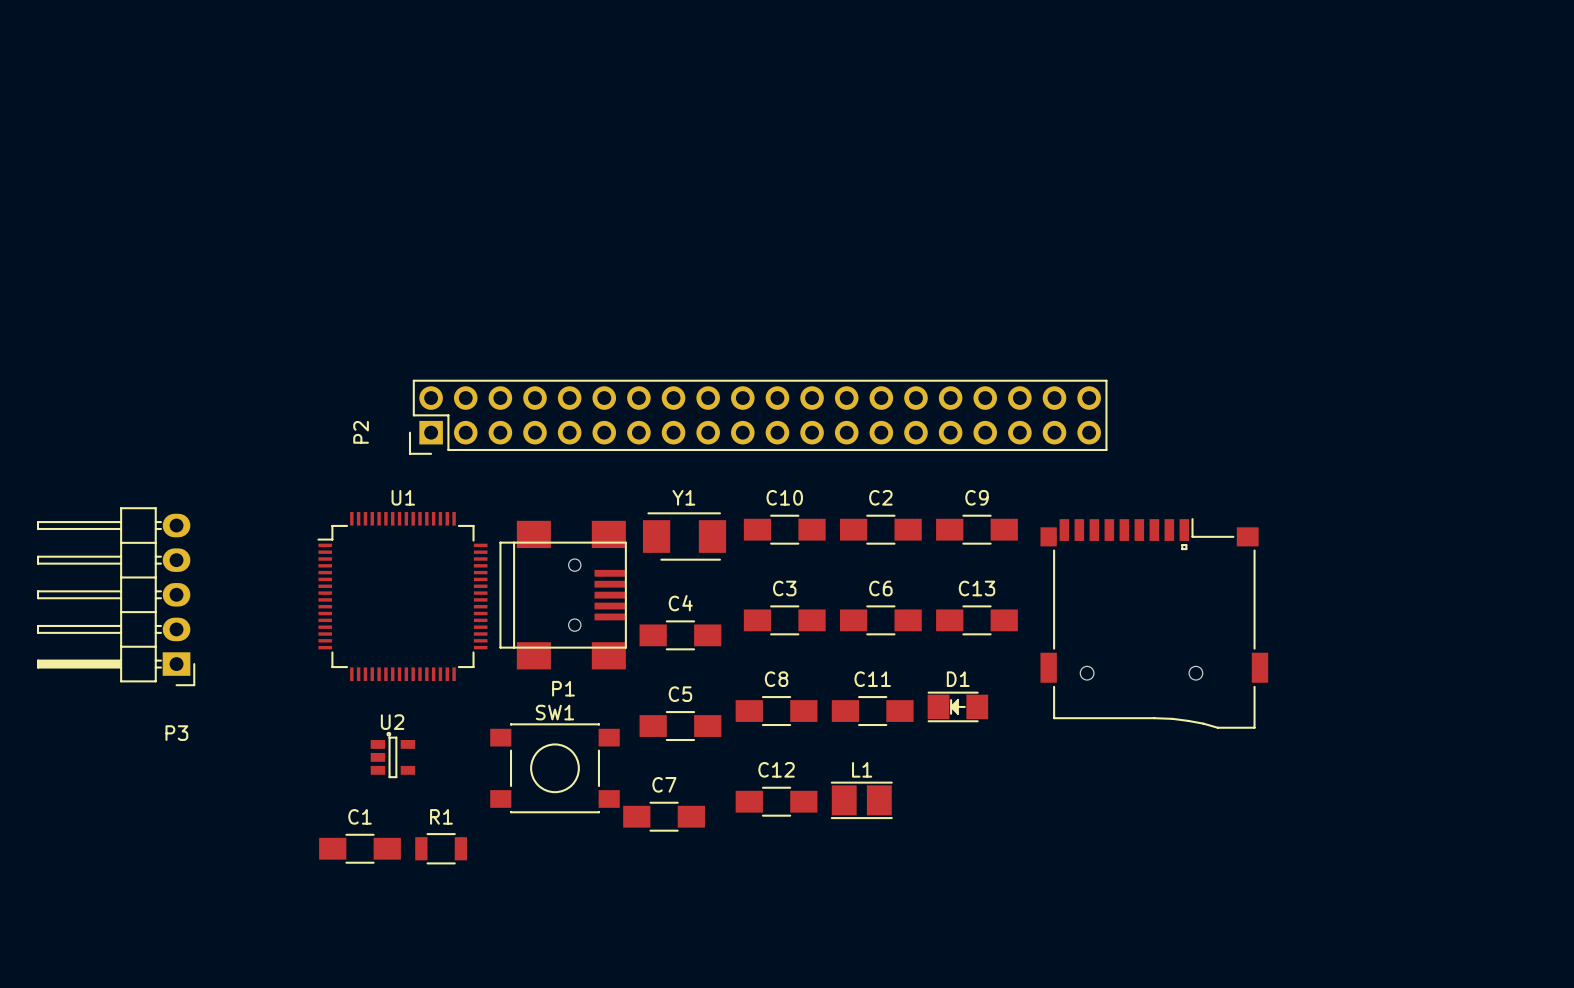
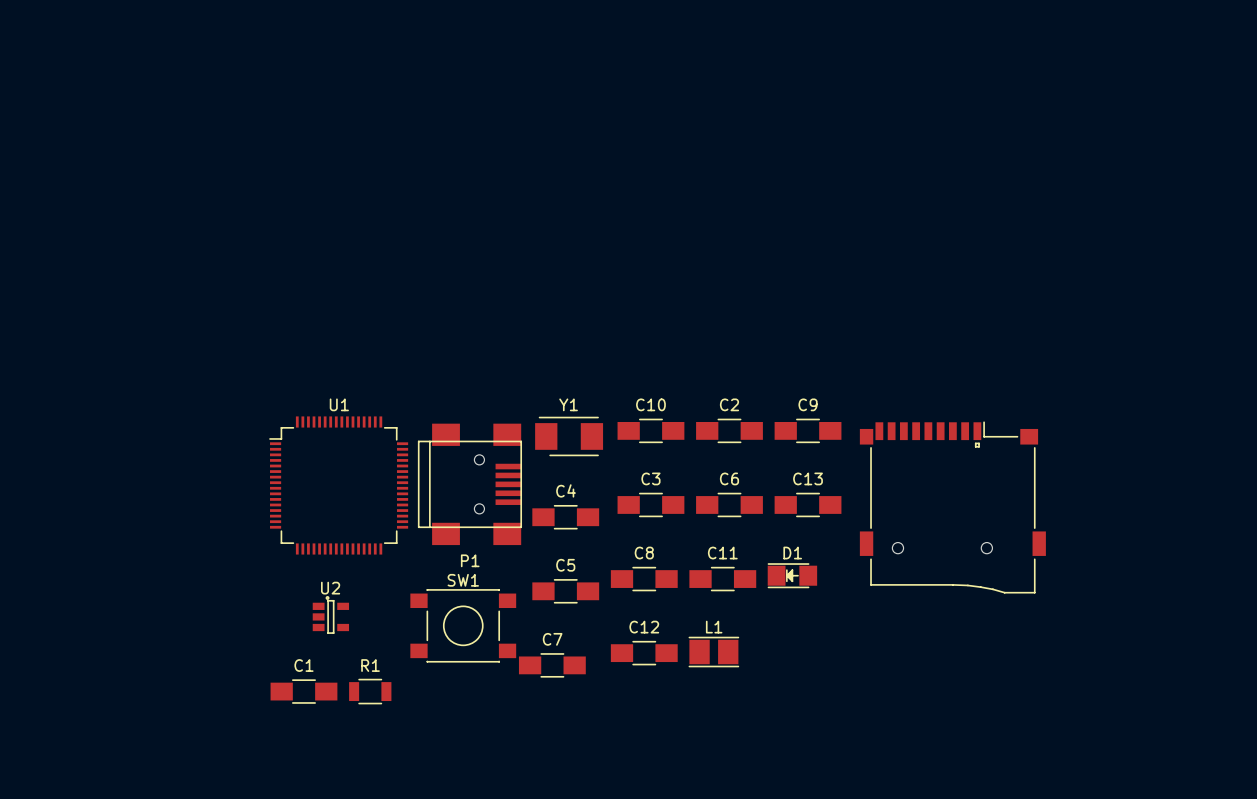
P2: (758, 417) -> none
P3: (116, 596) -> none

